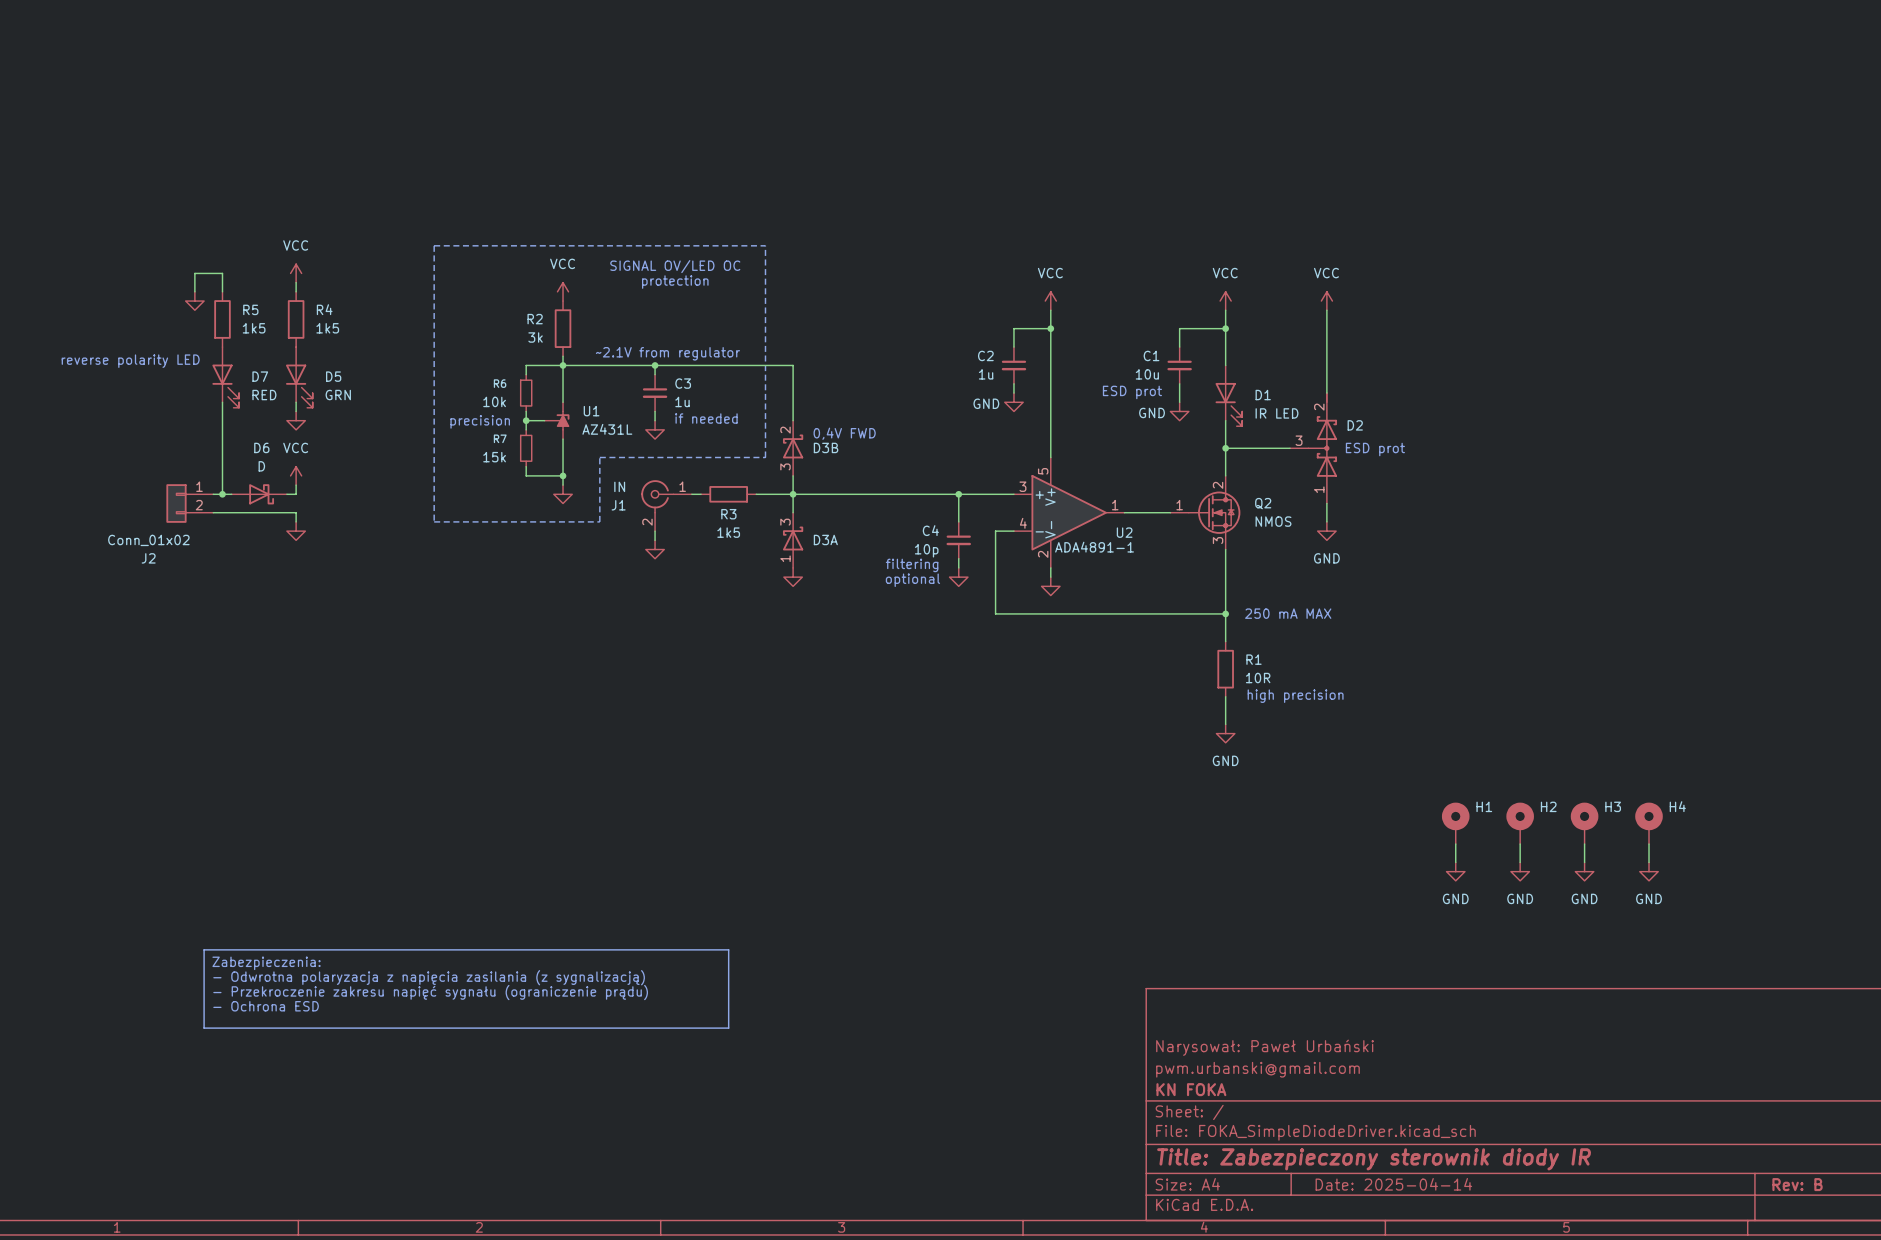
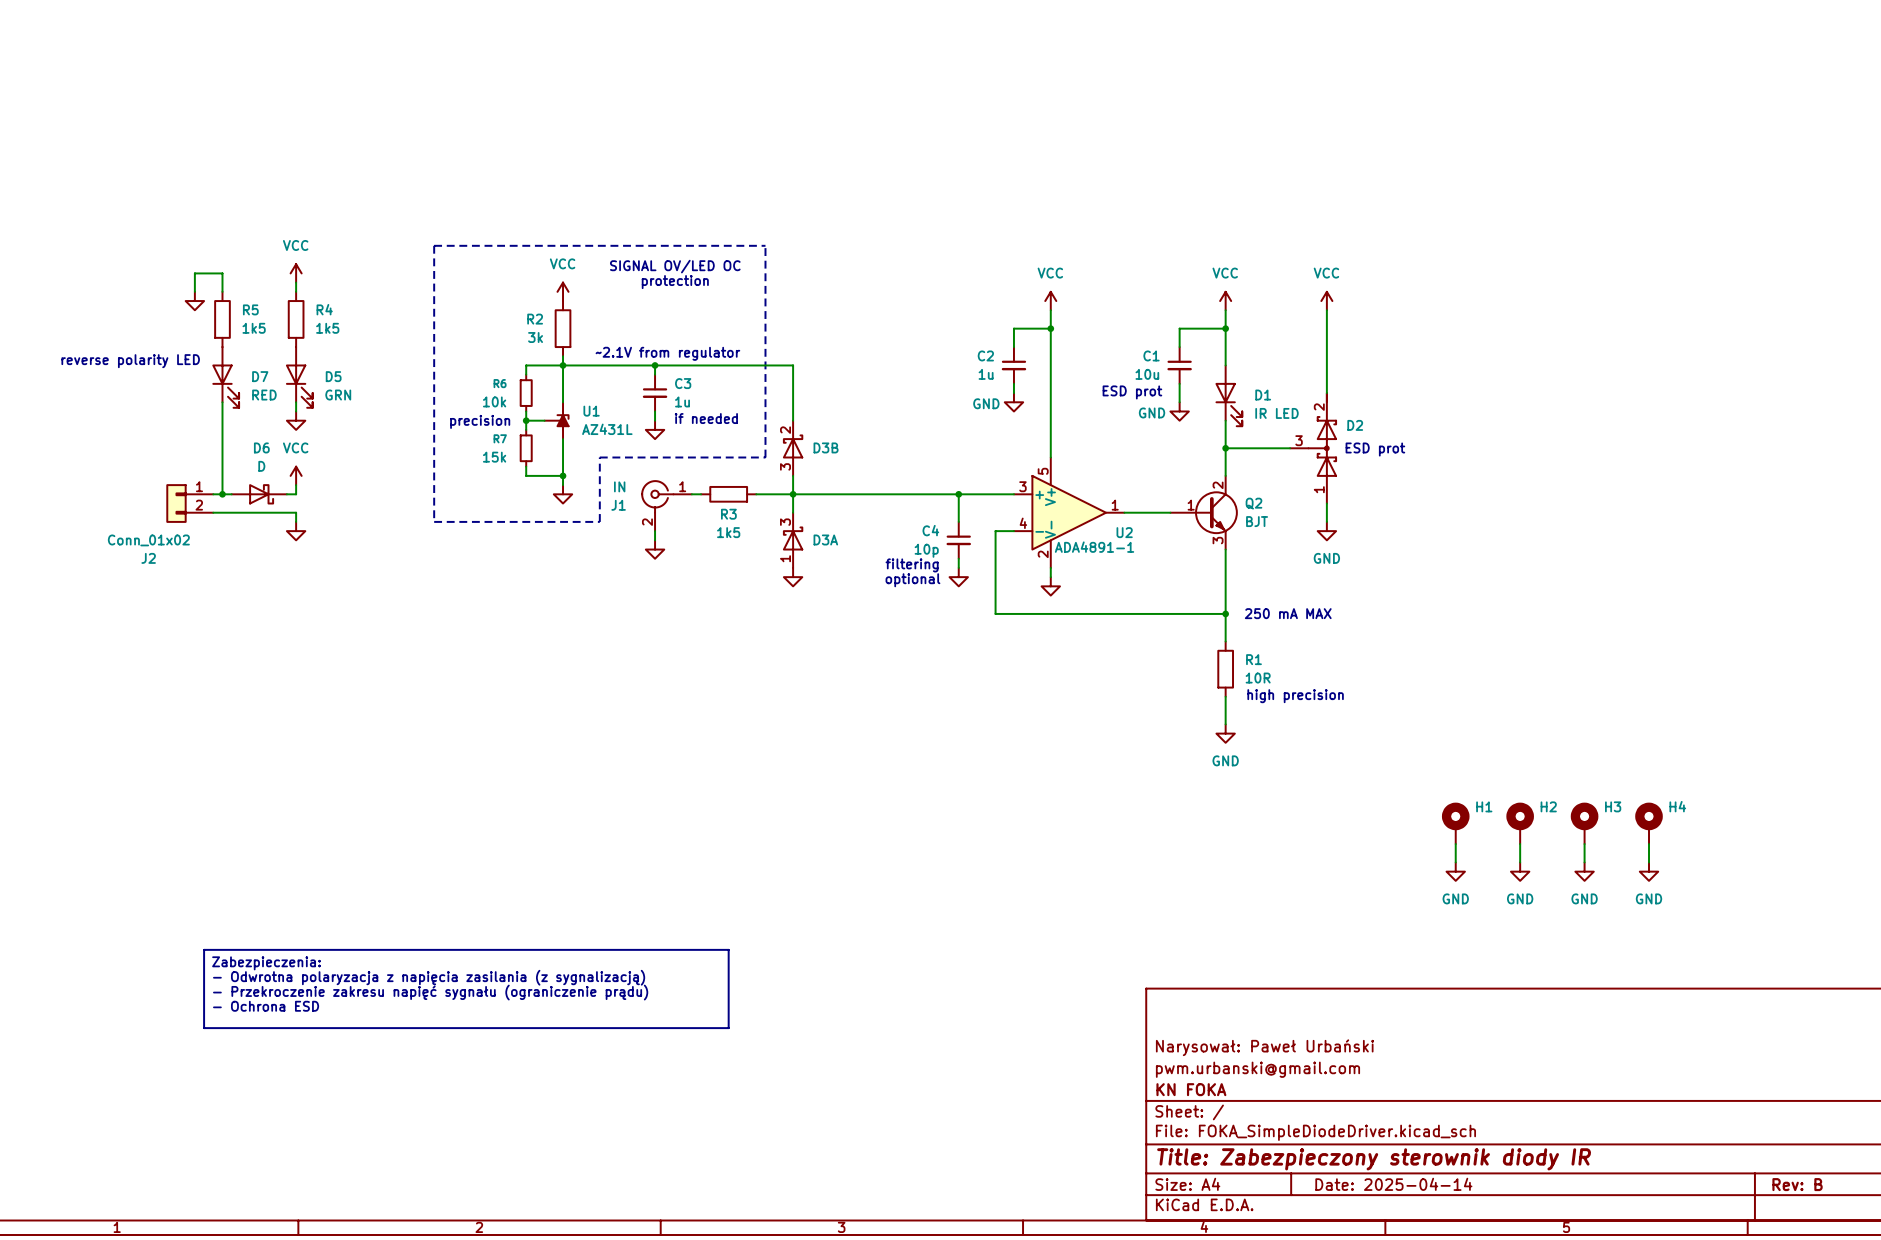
text: 0,4V FWD (844, 433) -> none
Q2 symbol: [1170, 475, 1241, 550] -> [1170, 475, 1238, 550]
Q2 value: NMOS (1273, 521) -> BJT (1257, 521)

